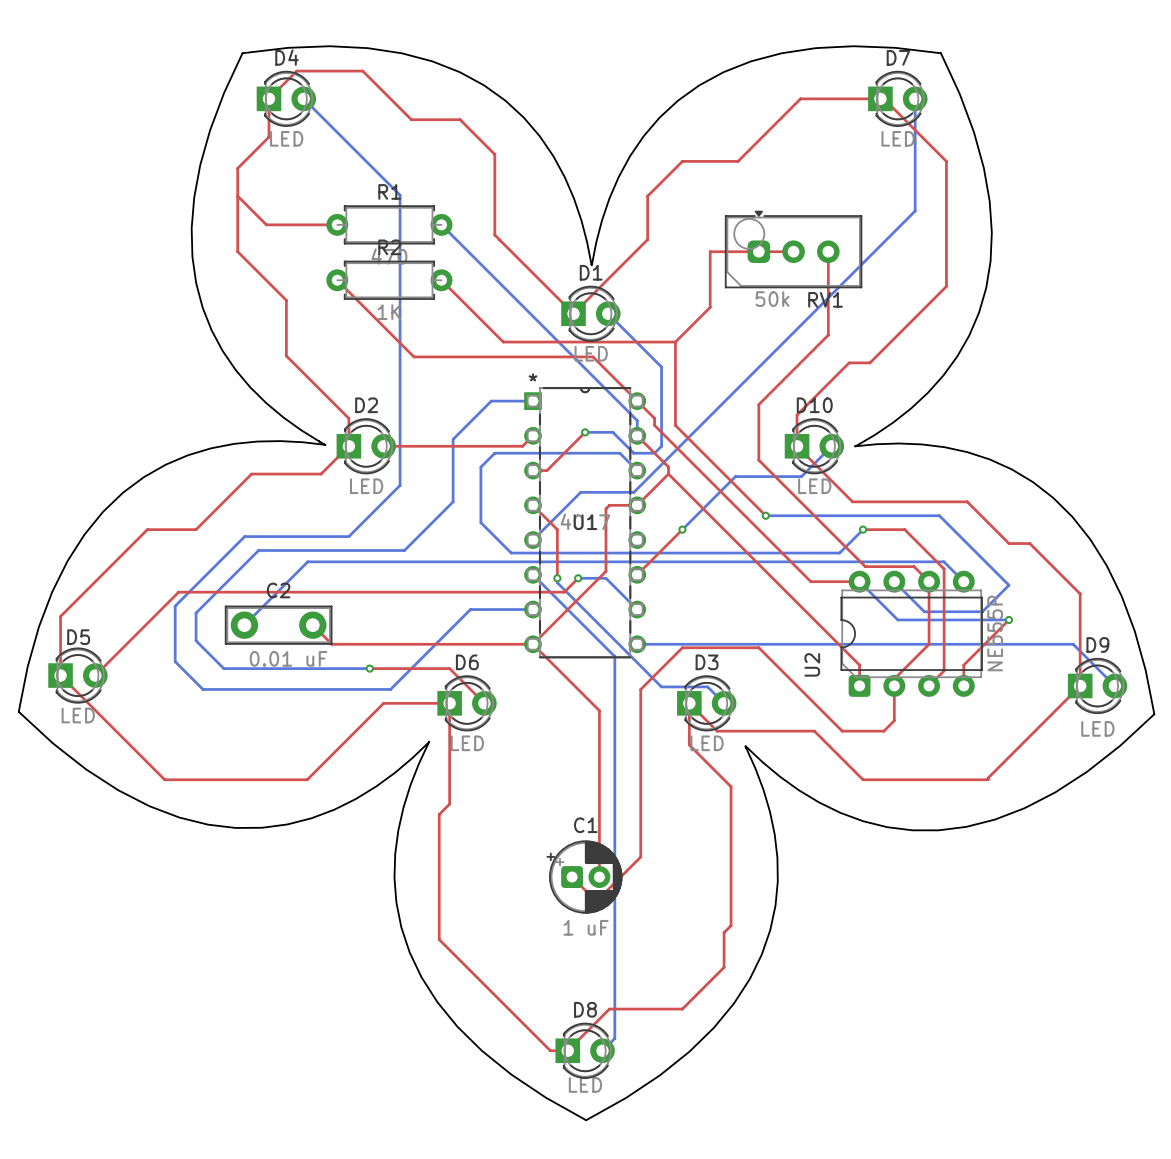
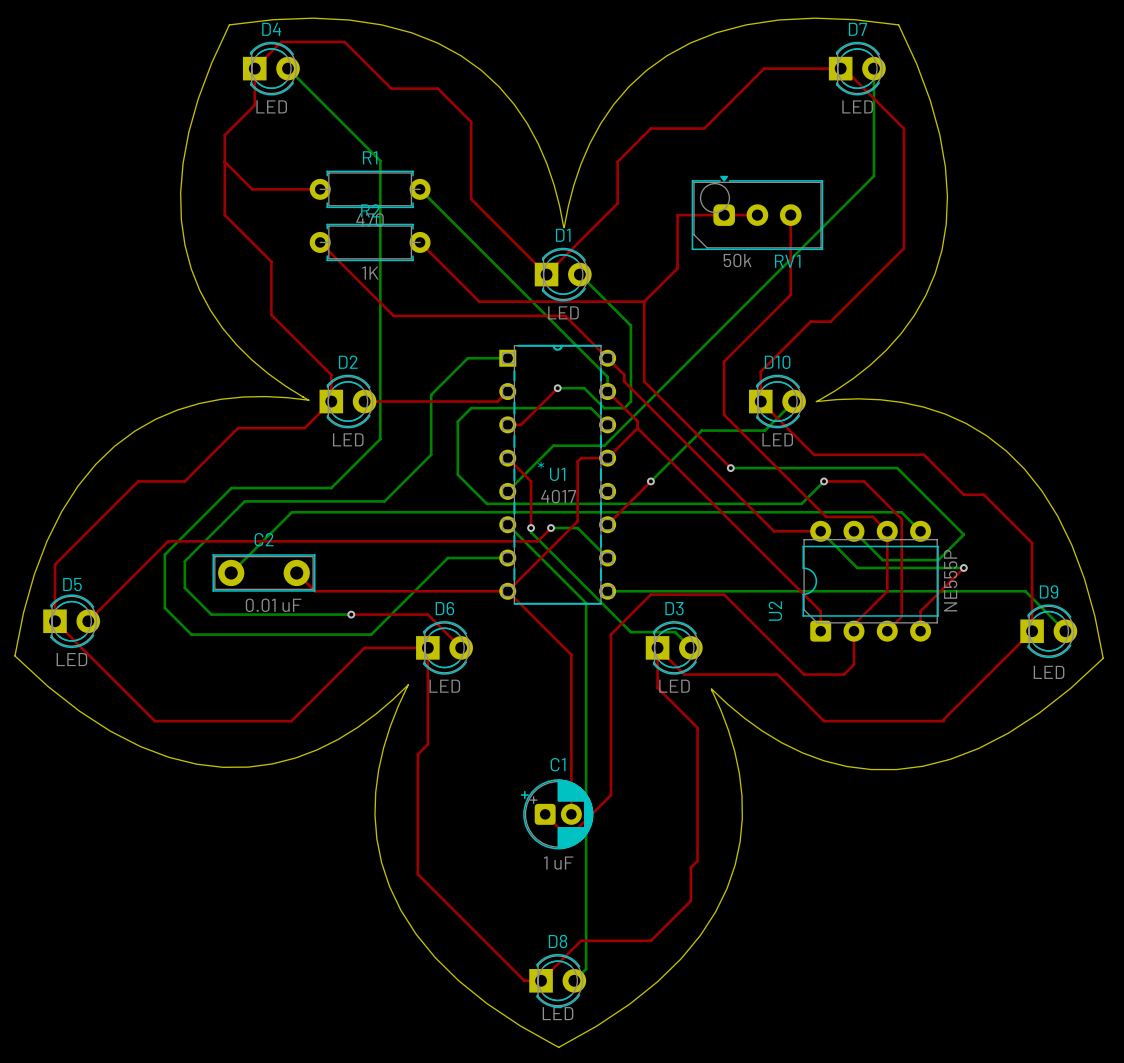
U1 footprint: [524, 387, 647, 659] -> [499, 344, 617, 605]

